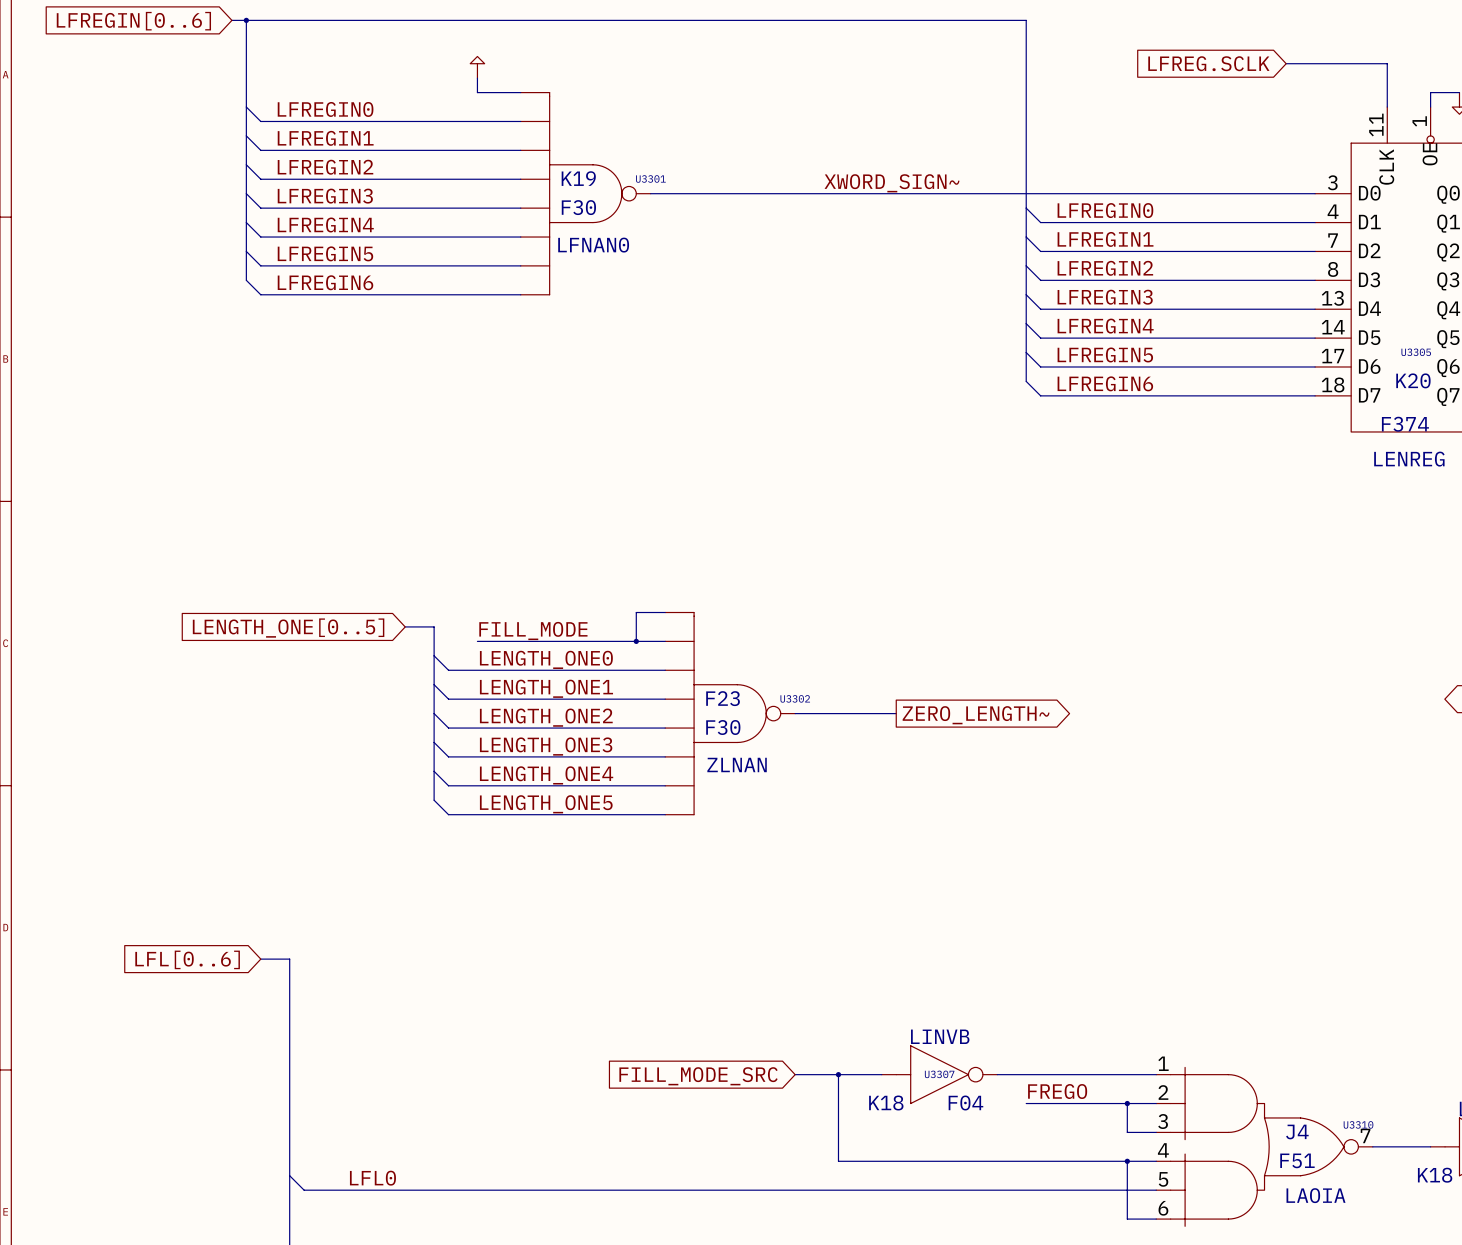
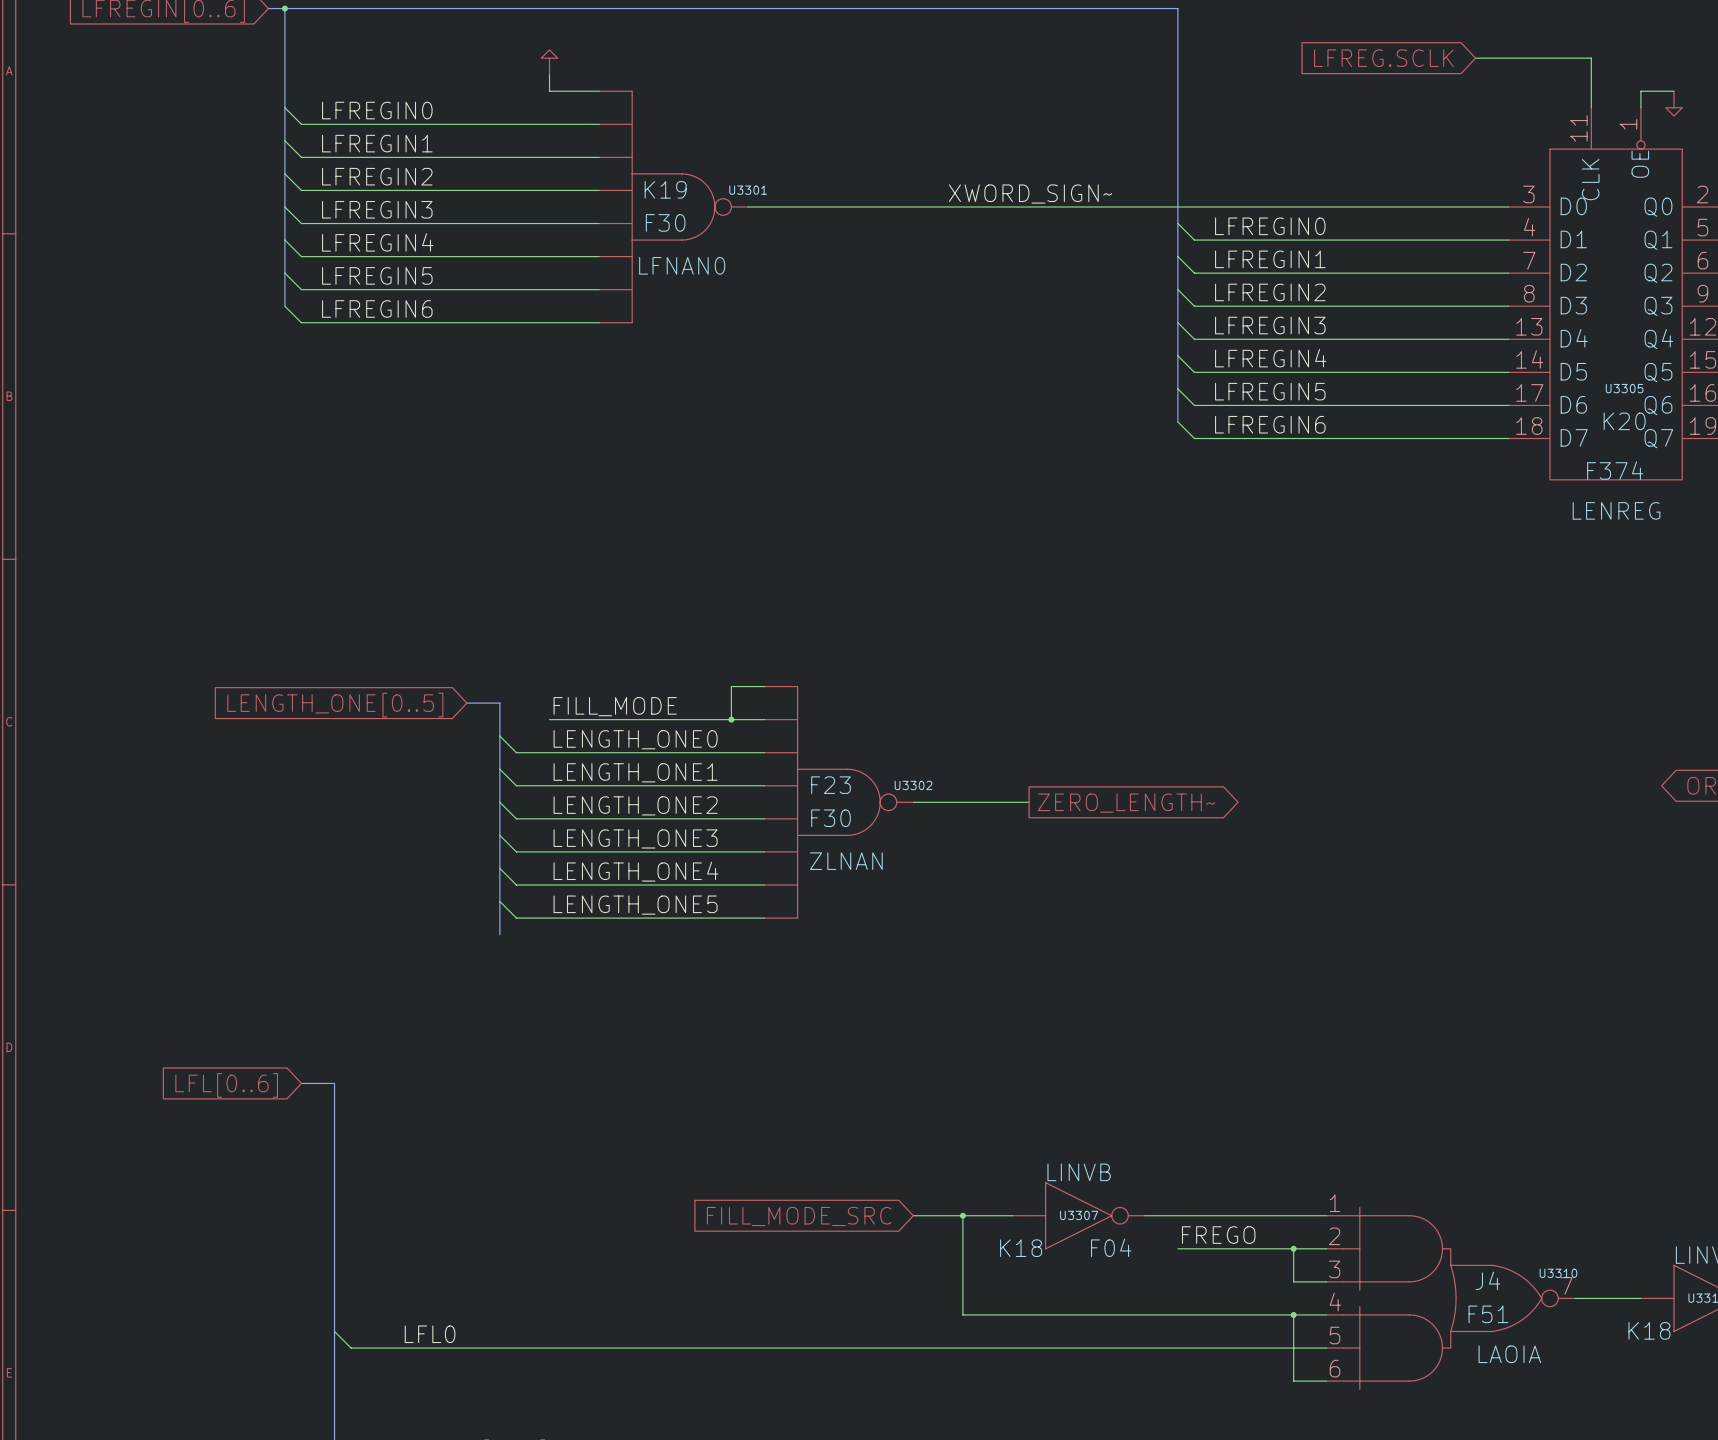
bus: none -> (499, 901) (499, 934)

